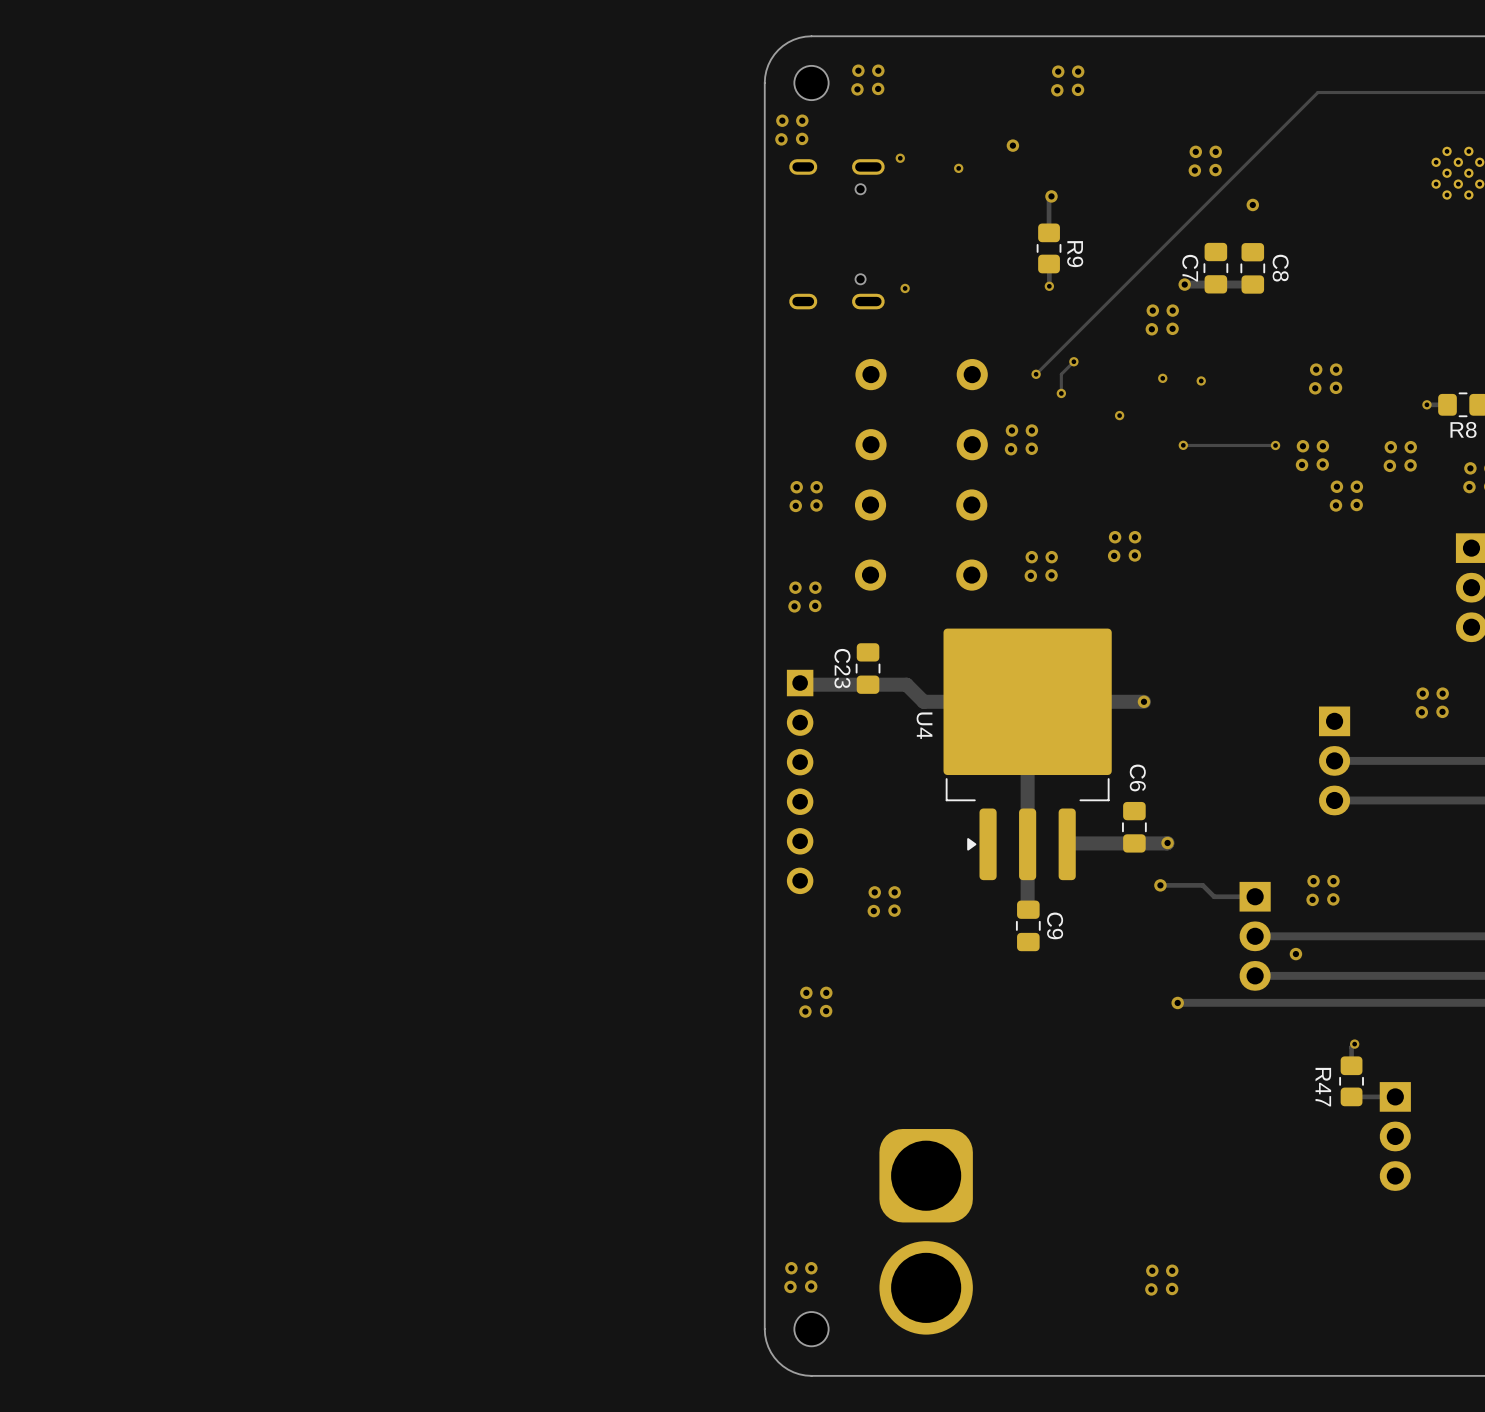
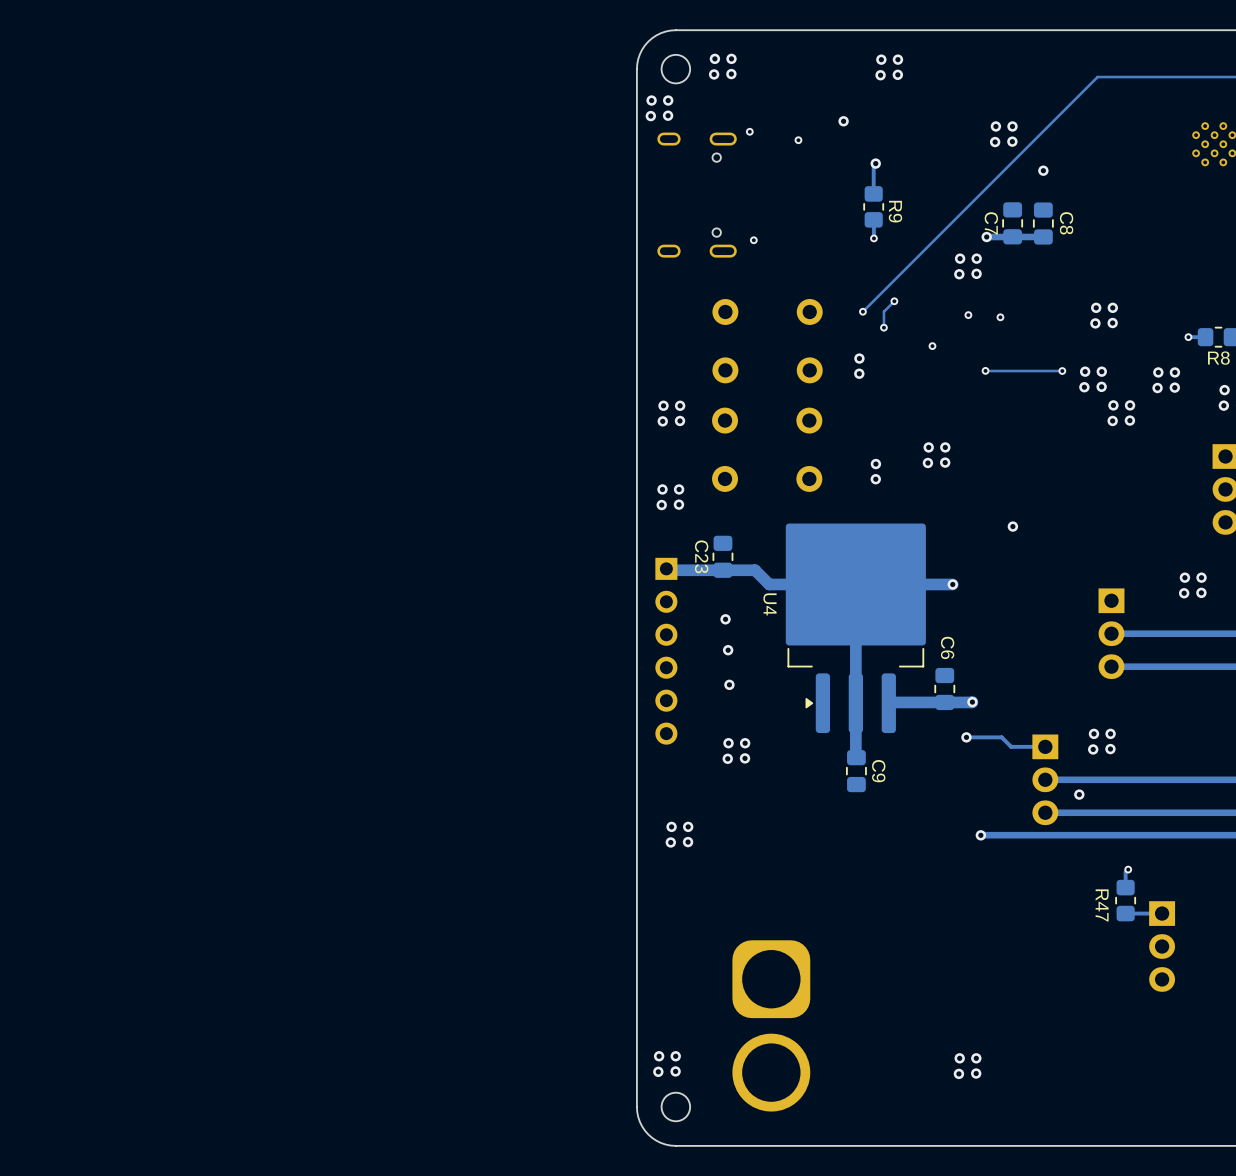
via: (1011, 430) -> none
via: (1011, 449) -> none
via: (1031, 557) -> none
via: (1030, 575) -> none
via: none -> (1012, 526)
via: none -> (725, 619)
via: none -> (728, 650)
via: none -> (729, 684)

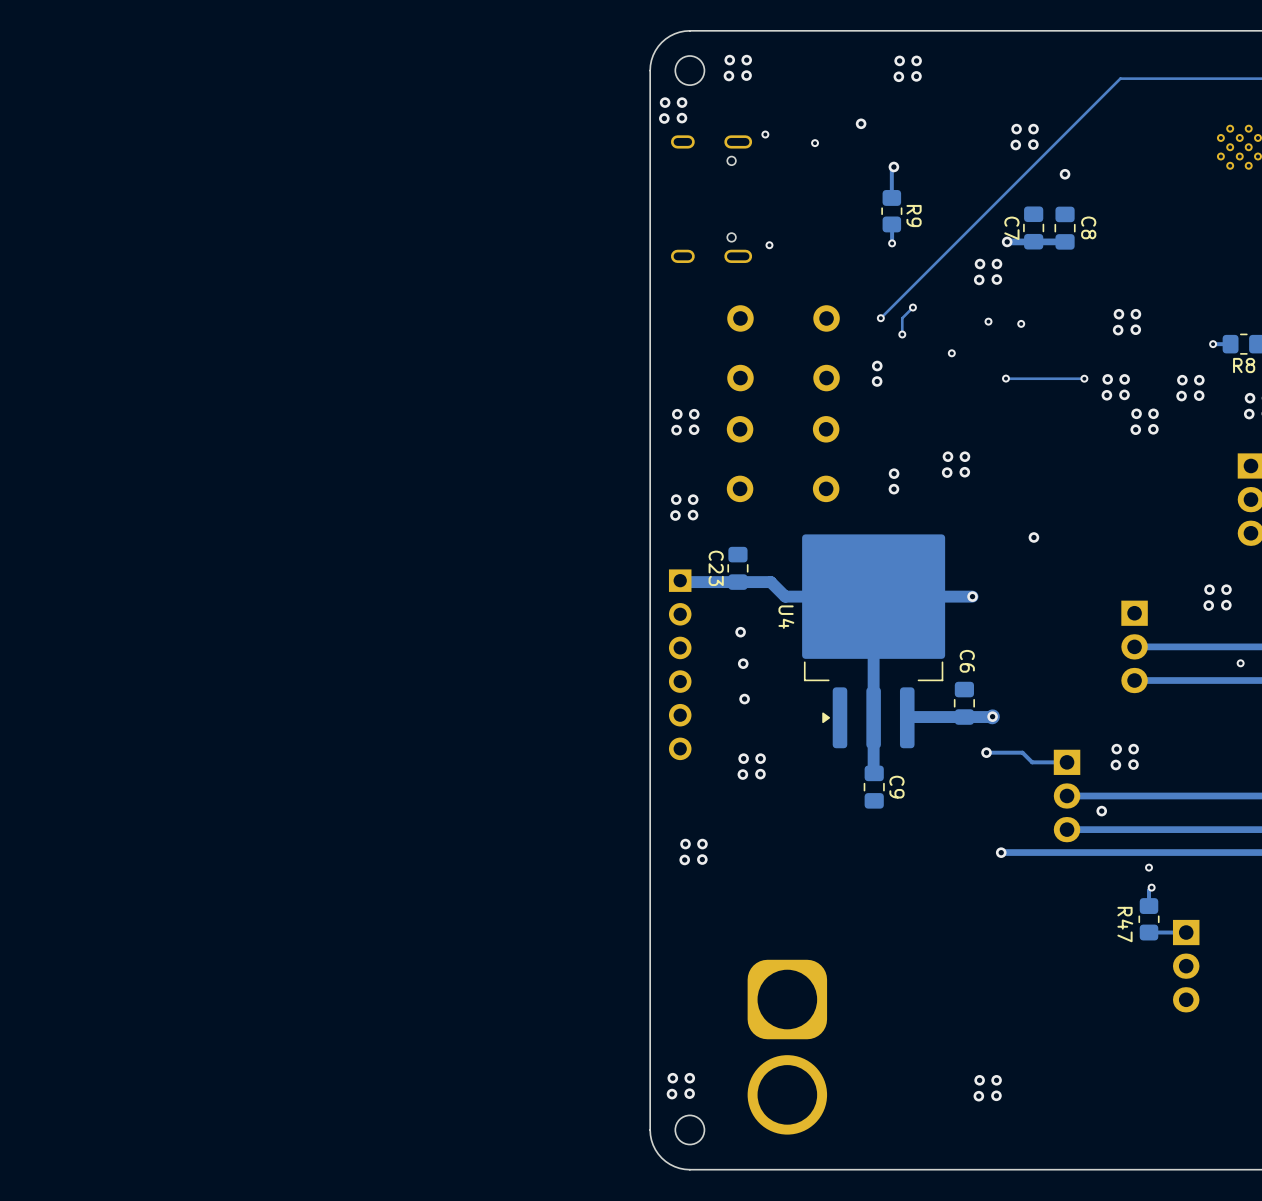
via: none -> (1240, 663)
via: none -> (1149, 867)

